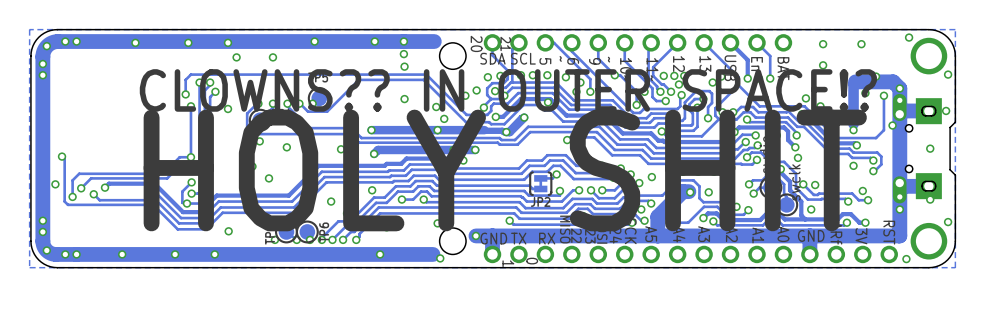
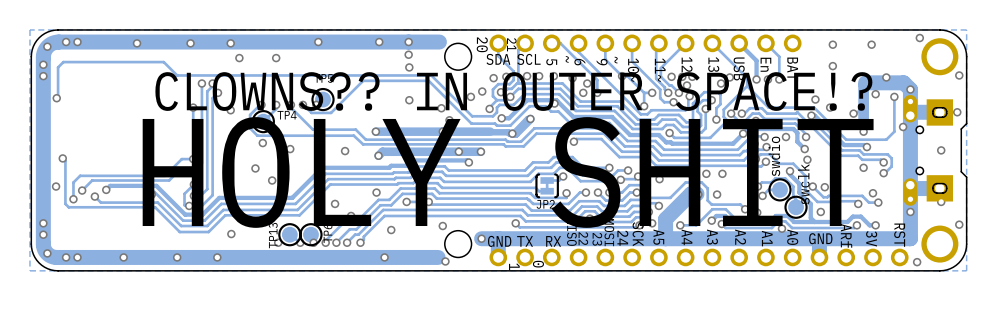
track: (190, 74) (185, 79) (185, 94) -> (193, 75) (177, 75) (163, 62) (63, 62) (58, 67) (56, 98)
via: (185, 94) -> none
via: none -> (56, 98)

